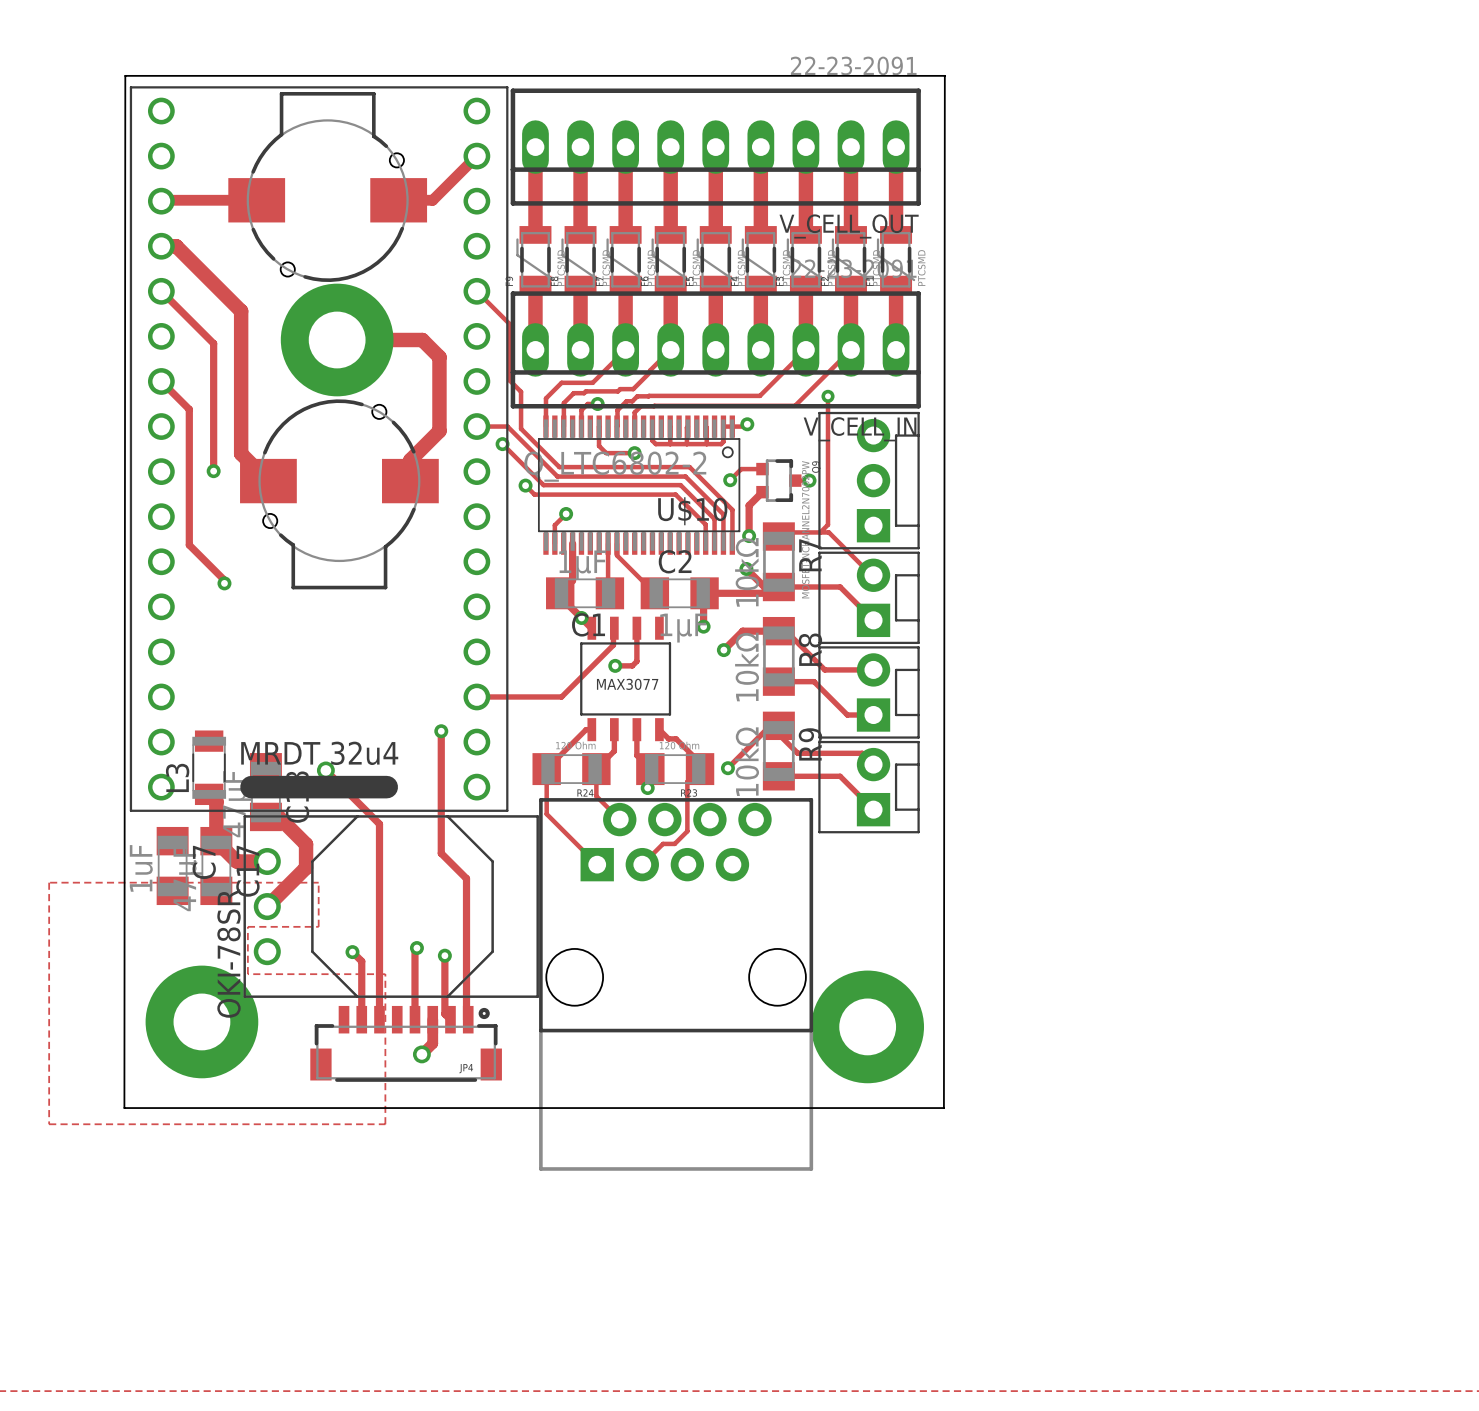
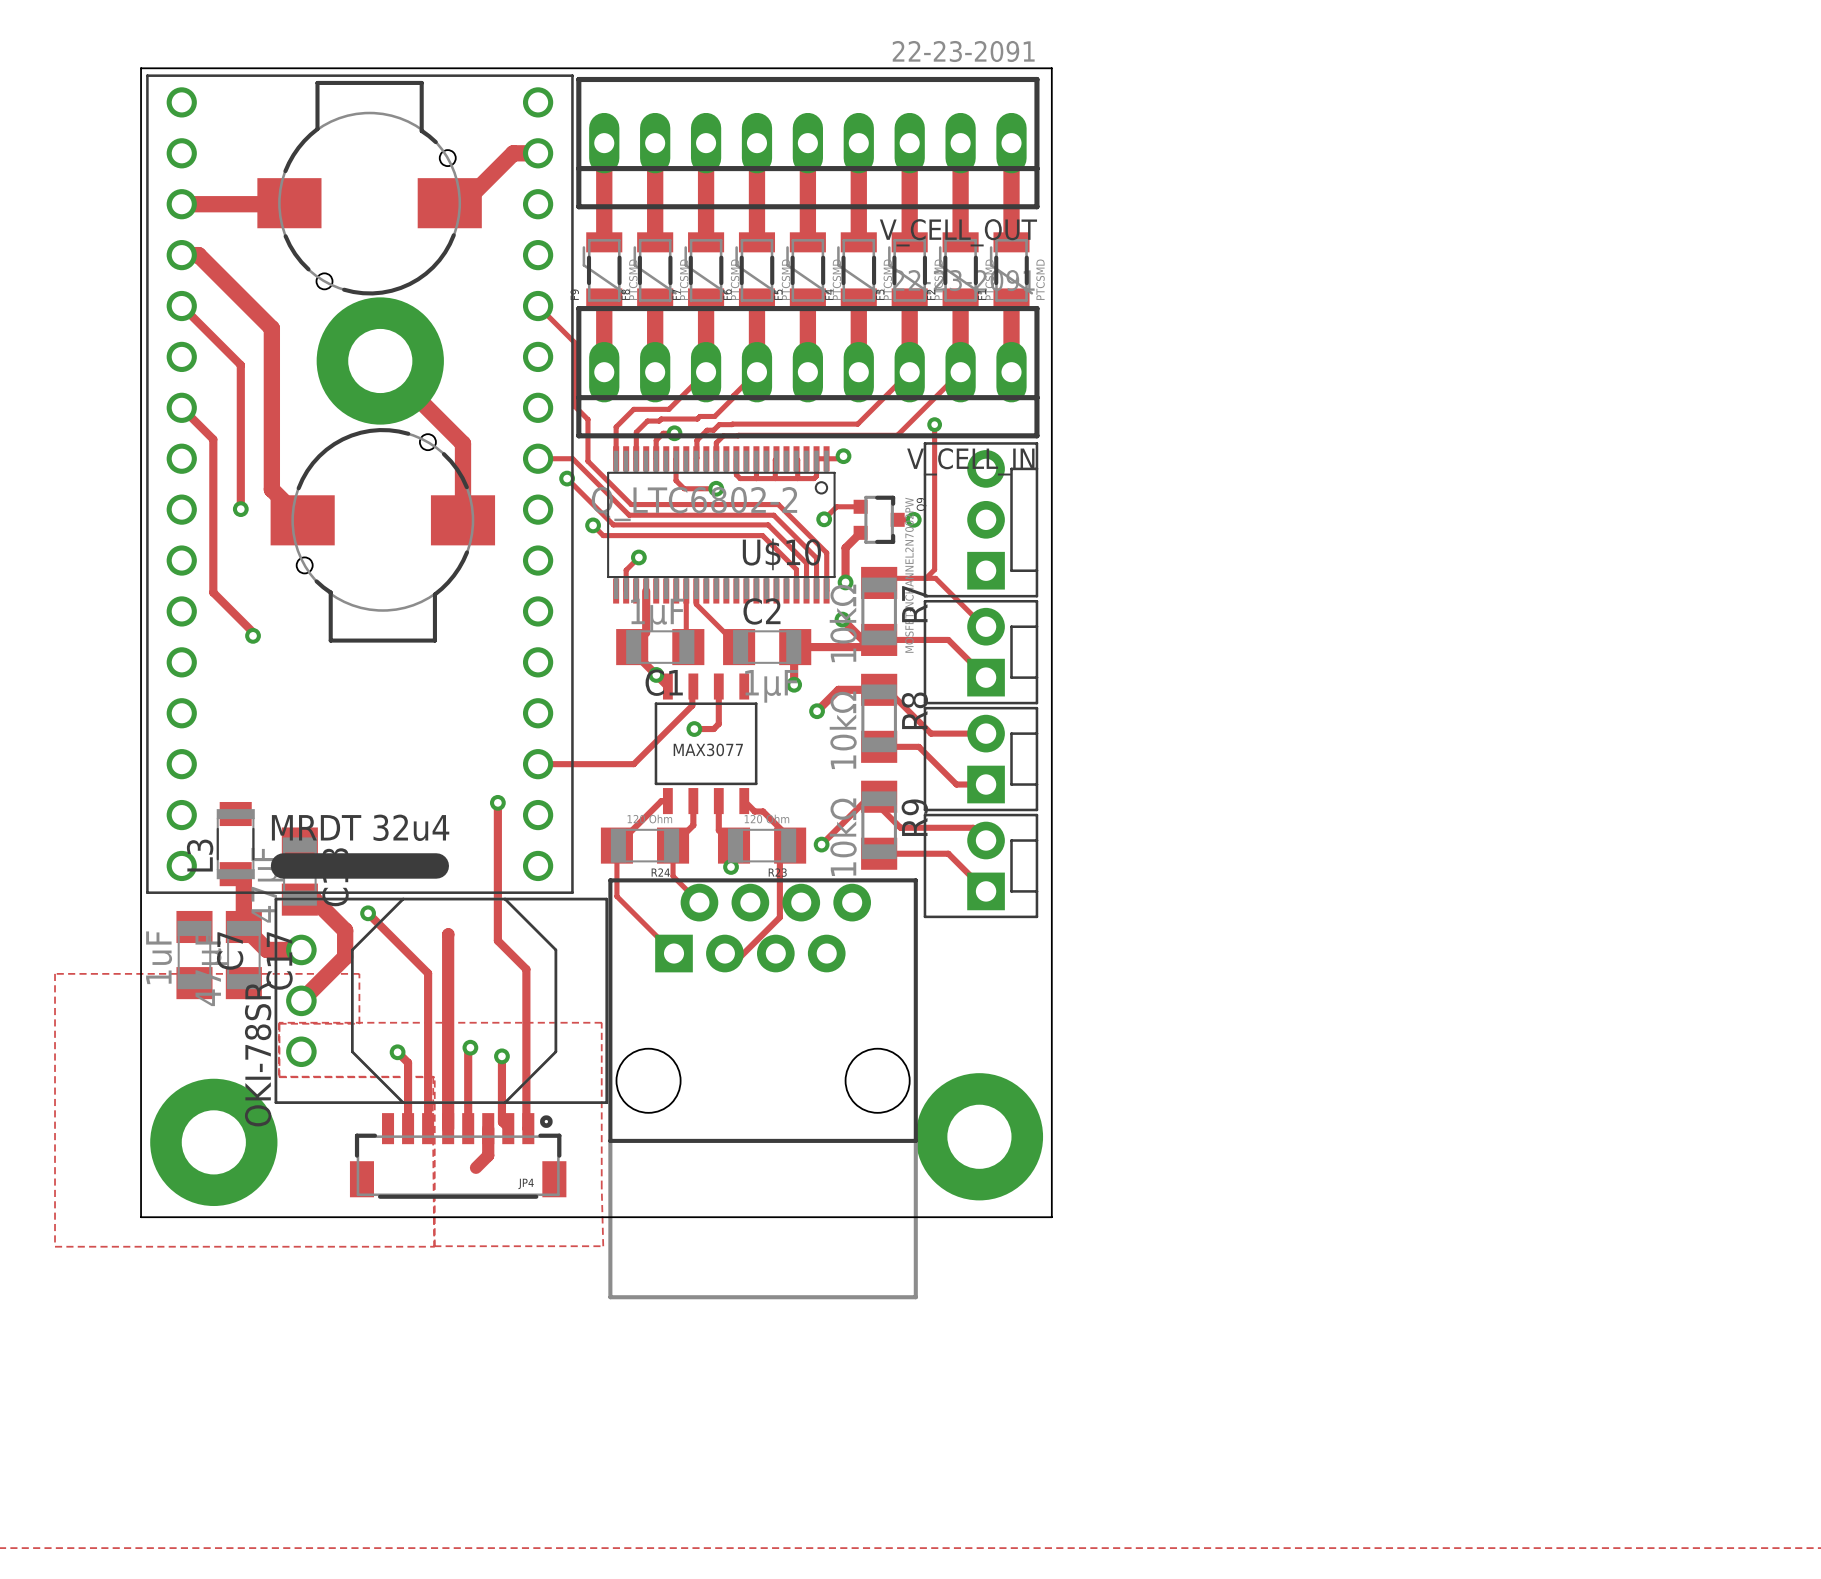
board edge: (125, 75) (944, 75) (943, 1108) (124, 1108) (125, 75) -> (141, 68) (141, 1217) (1051, 1217) (1051, 68) (141, 68)
track: (476, 156) (432, 200) (398, 200) -> (538, 153) (513, 153) (463, 203)
track: (256, 200) (161, 201) -> (312, 208) (312, 204) (181, 204)
track: (337, 340) (422, 340) (439, 357) (439, 431) (410, 460) -> (380, 360) (462, 443) (462, 496)
track: (700, 769) (687, 781) (687, 831) (674, 843) (663, 843) (642, 864) -> none
track: (325, 770) (379, 824) (379, 882) -> (368, 913) (428, 973)
via: (325, 770) -> none
track: none -> (779, 855) (779, 917) (739, 957) (728, 957)
via: none -> (368, 913)
track: none -> (448, 934) (448, 1128)
zone outline: none -> (278, 1022) (278, 1076) (433, 1076) (434, 1246) (603, 1246) (601, 1022) (278, 1022)
part position: (201, 1021) -> (213, 1142)
via: (421, 1054) -> none

